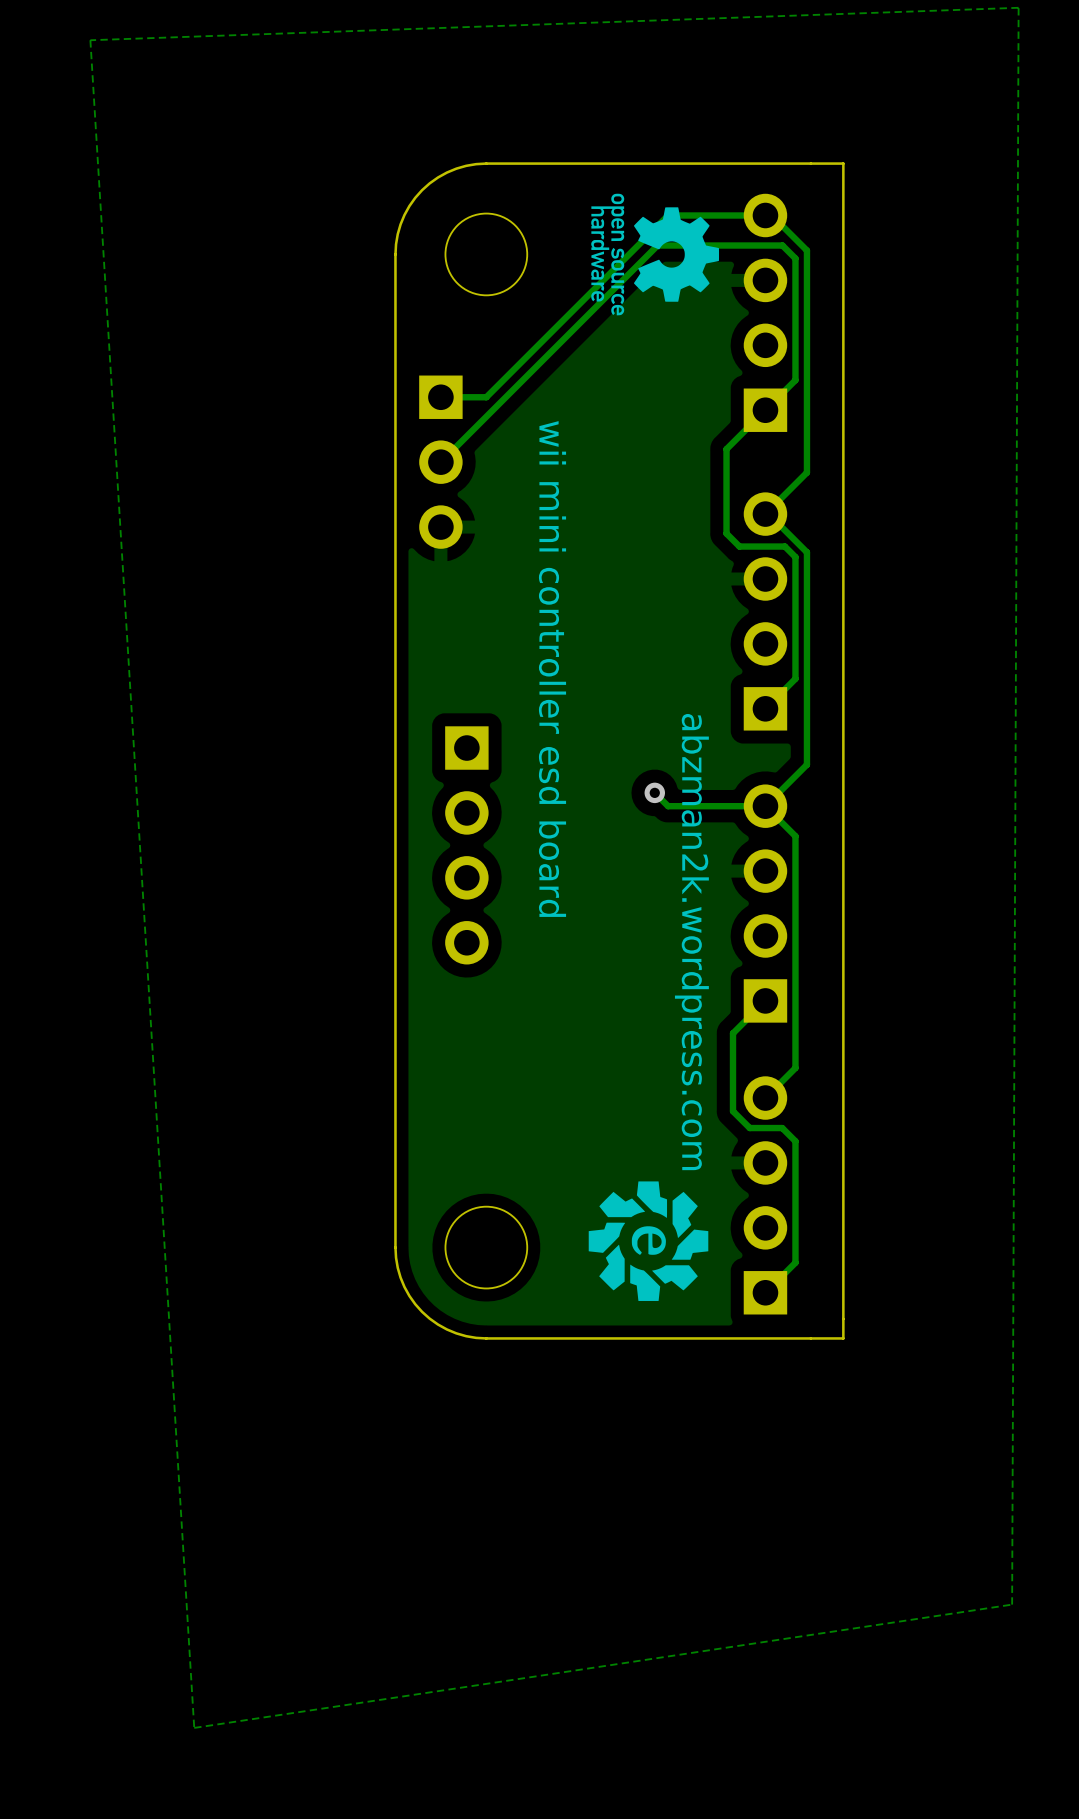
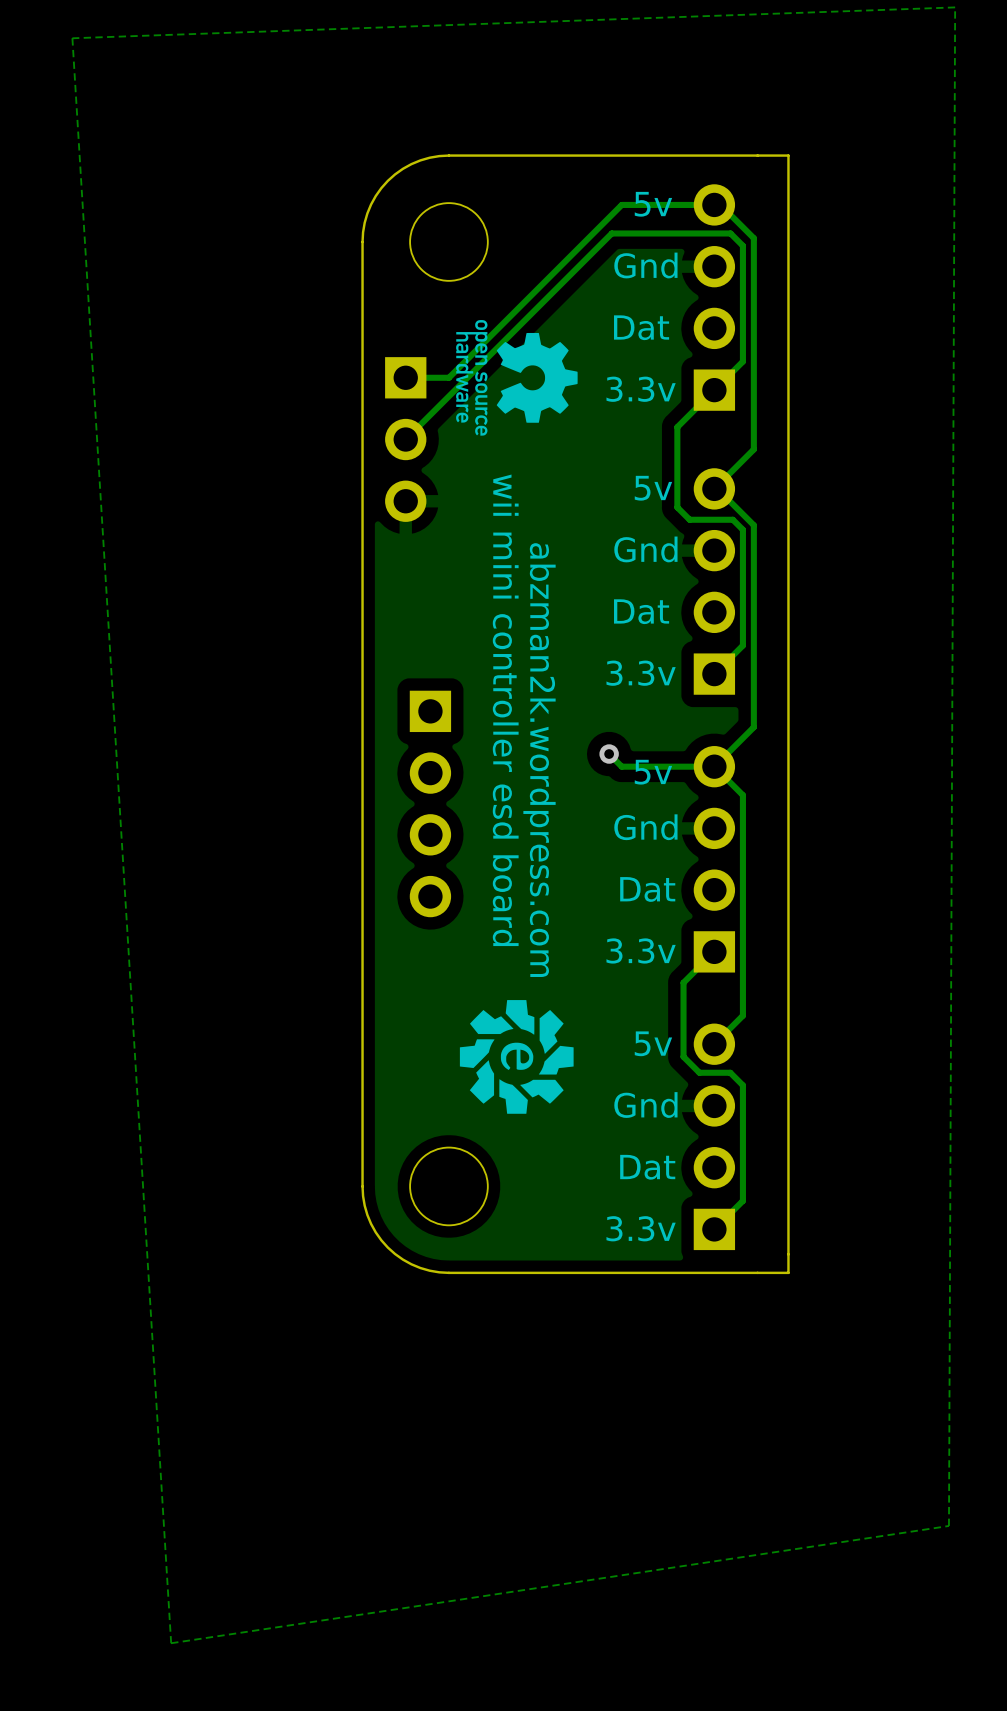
text: none -> 5v (653, 204)
drawing position: (655, 254) -> (516, 377)
text: none -> Gnd (645, 265)
text: none -> Dat (641, 327)
text: none -> 3.3v (641, 389)
text: none -> 5v (653, 488)
text: none -> Gnd (645, 549)
text: none -> Dat (641, 611)
text position: wii mini controller esd board (552, 669) -> wii mini controller esd board (505, 710)
text: none -> 3.3v (641, 673)
text: none -> 5v (653, 772)
text: none -> Gnd (645, 827)
text: none -> Dat (647, 889)
text position: abzman2k.wordpress.com (691, 942) -> abzman2k.wordpress.com (539, 760)
text: none -> 3.3v (641, 950)
text: none -> 5v (653, 1043)
text: none -> Gnd (645, 1105)
text: none -> Dat (647, 1167)
drawing position: (648, 1241) -> (516, 1056)
text: none -> 3.3v (641, 1228)

